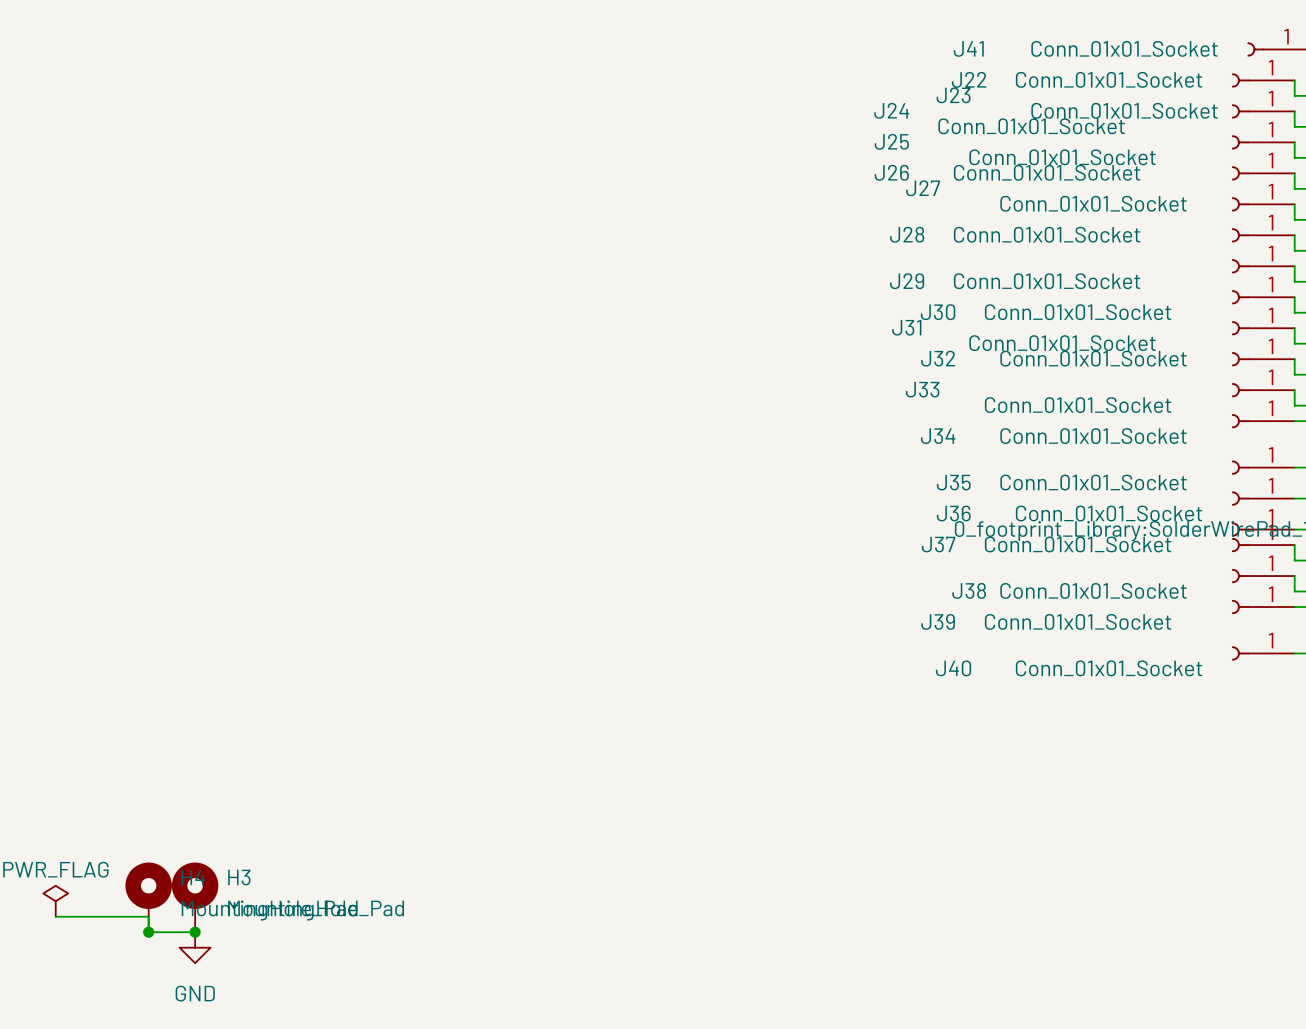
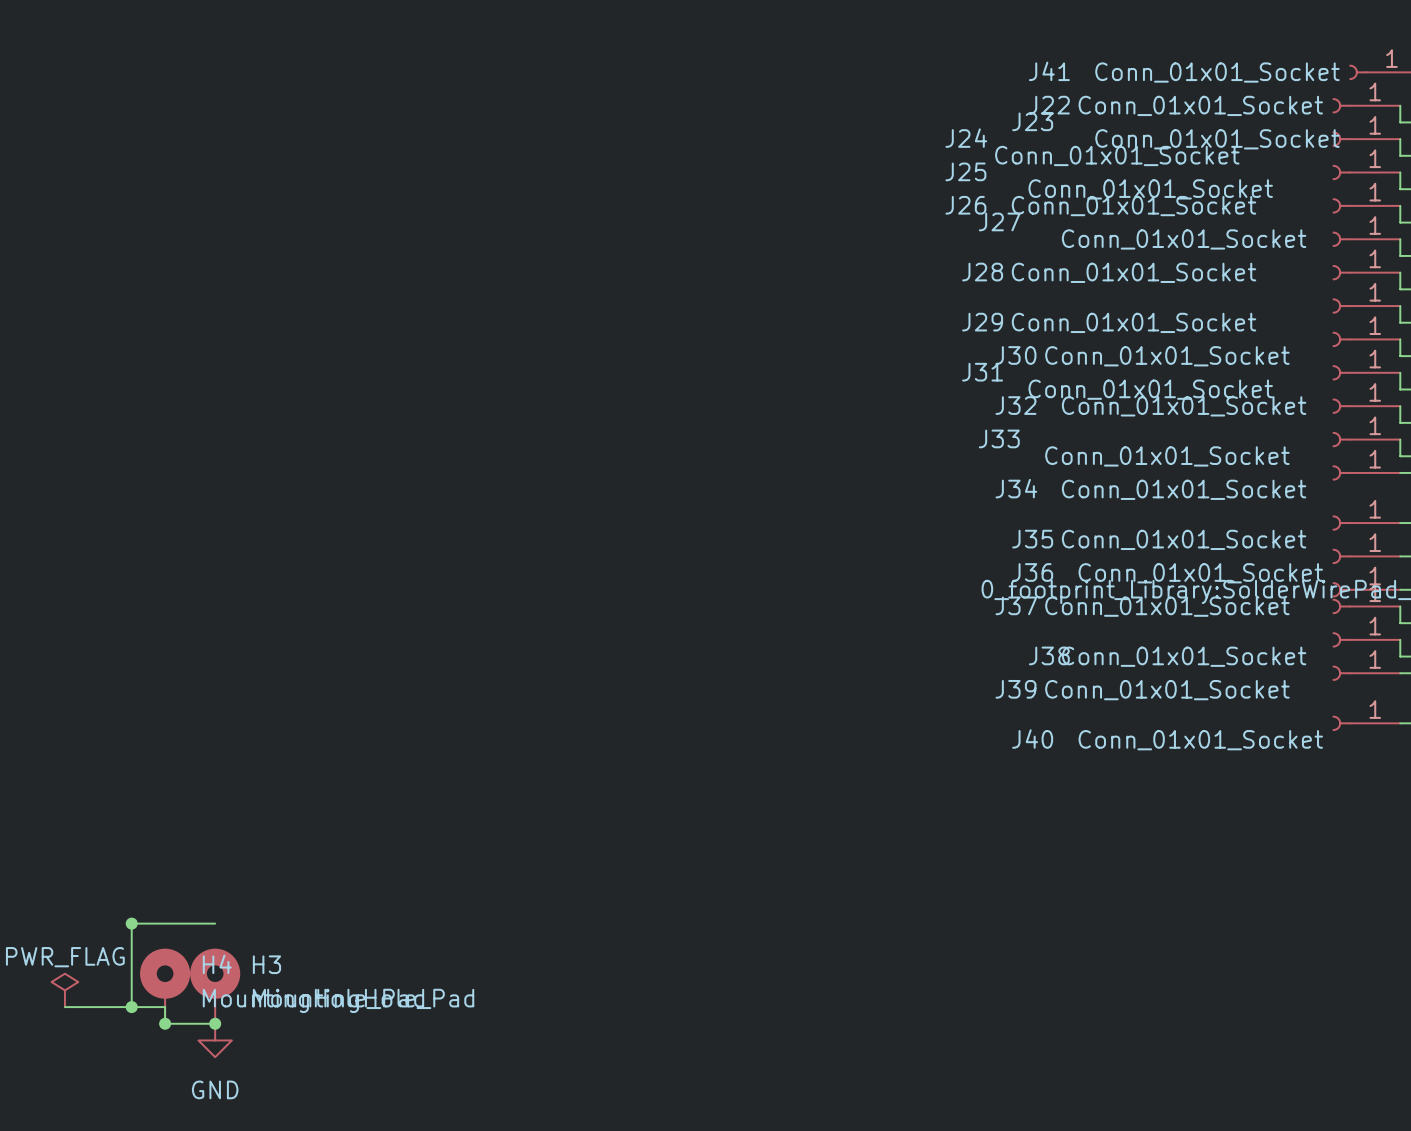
junction: none -> (131, 923)
wire: none -> (215, 923) (131, 923) (131, 1007)
junction: none -> (131, 1007)

